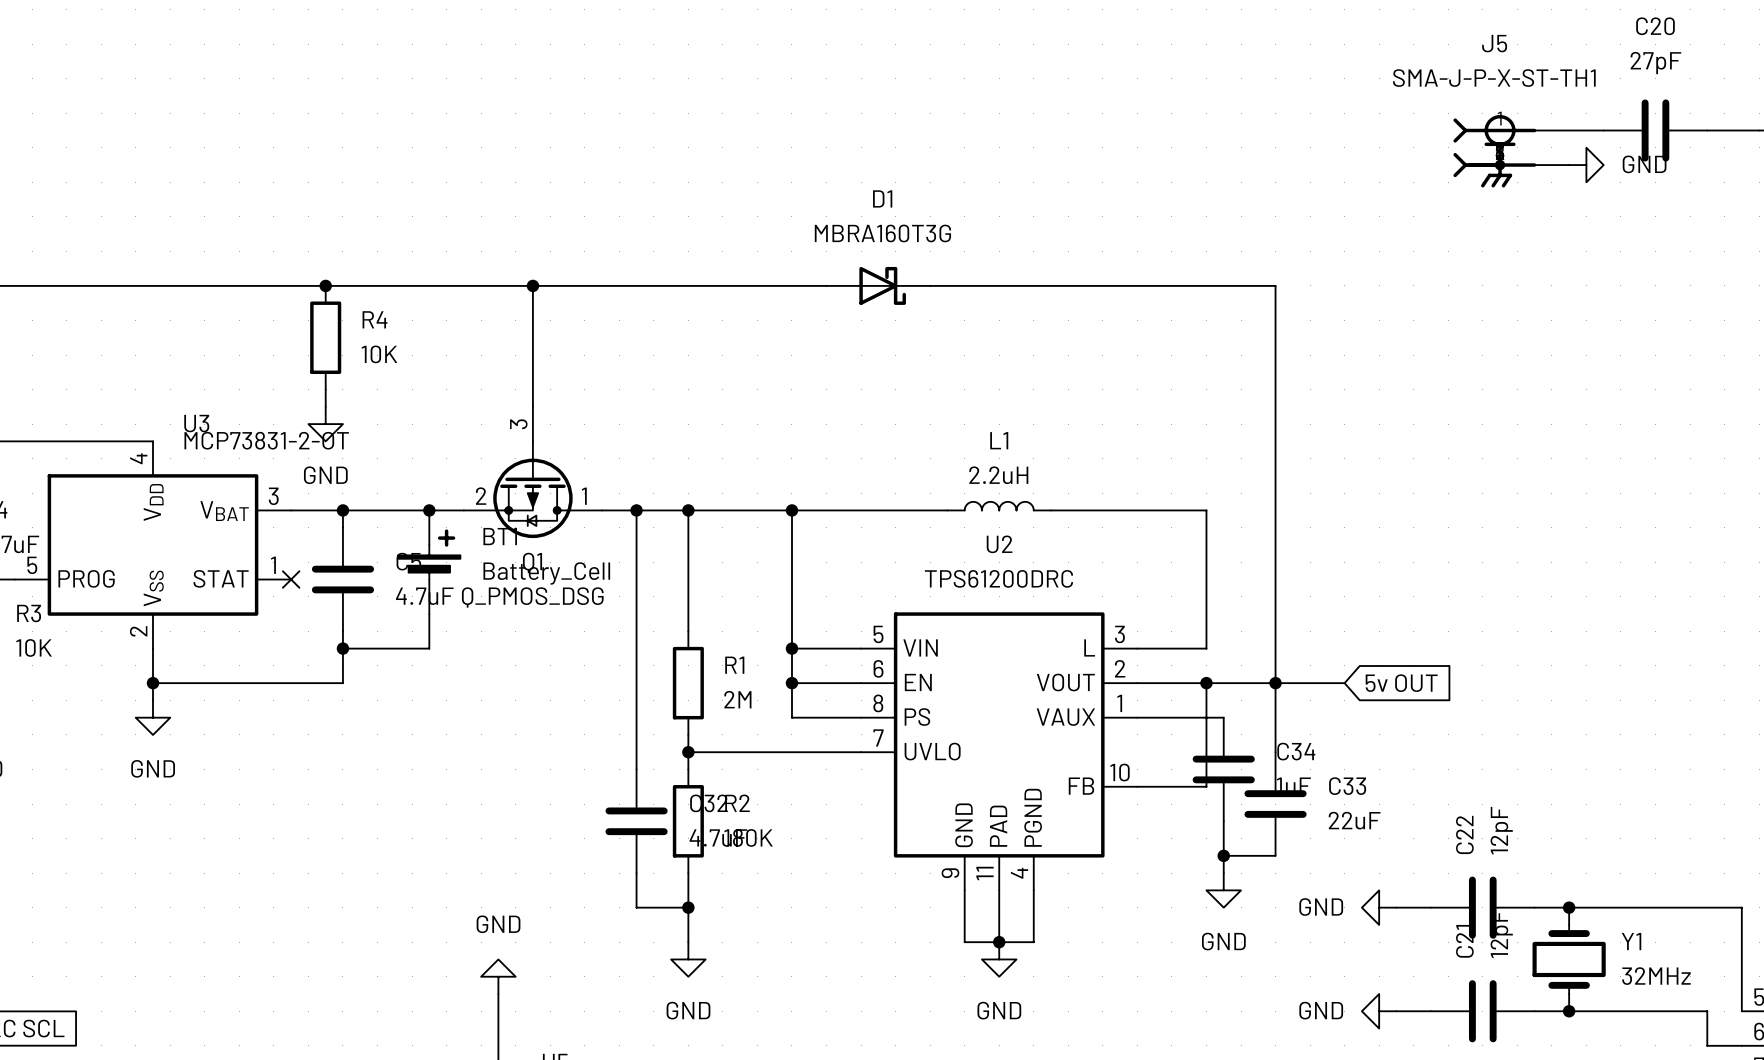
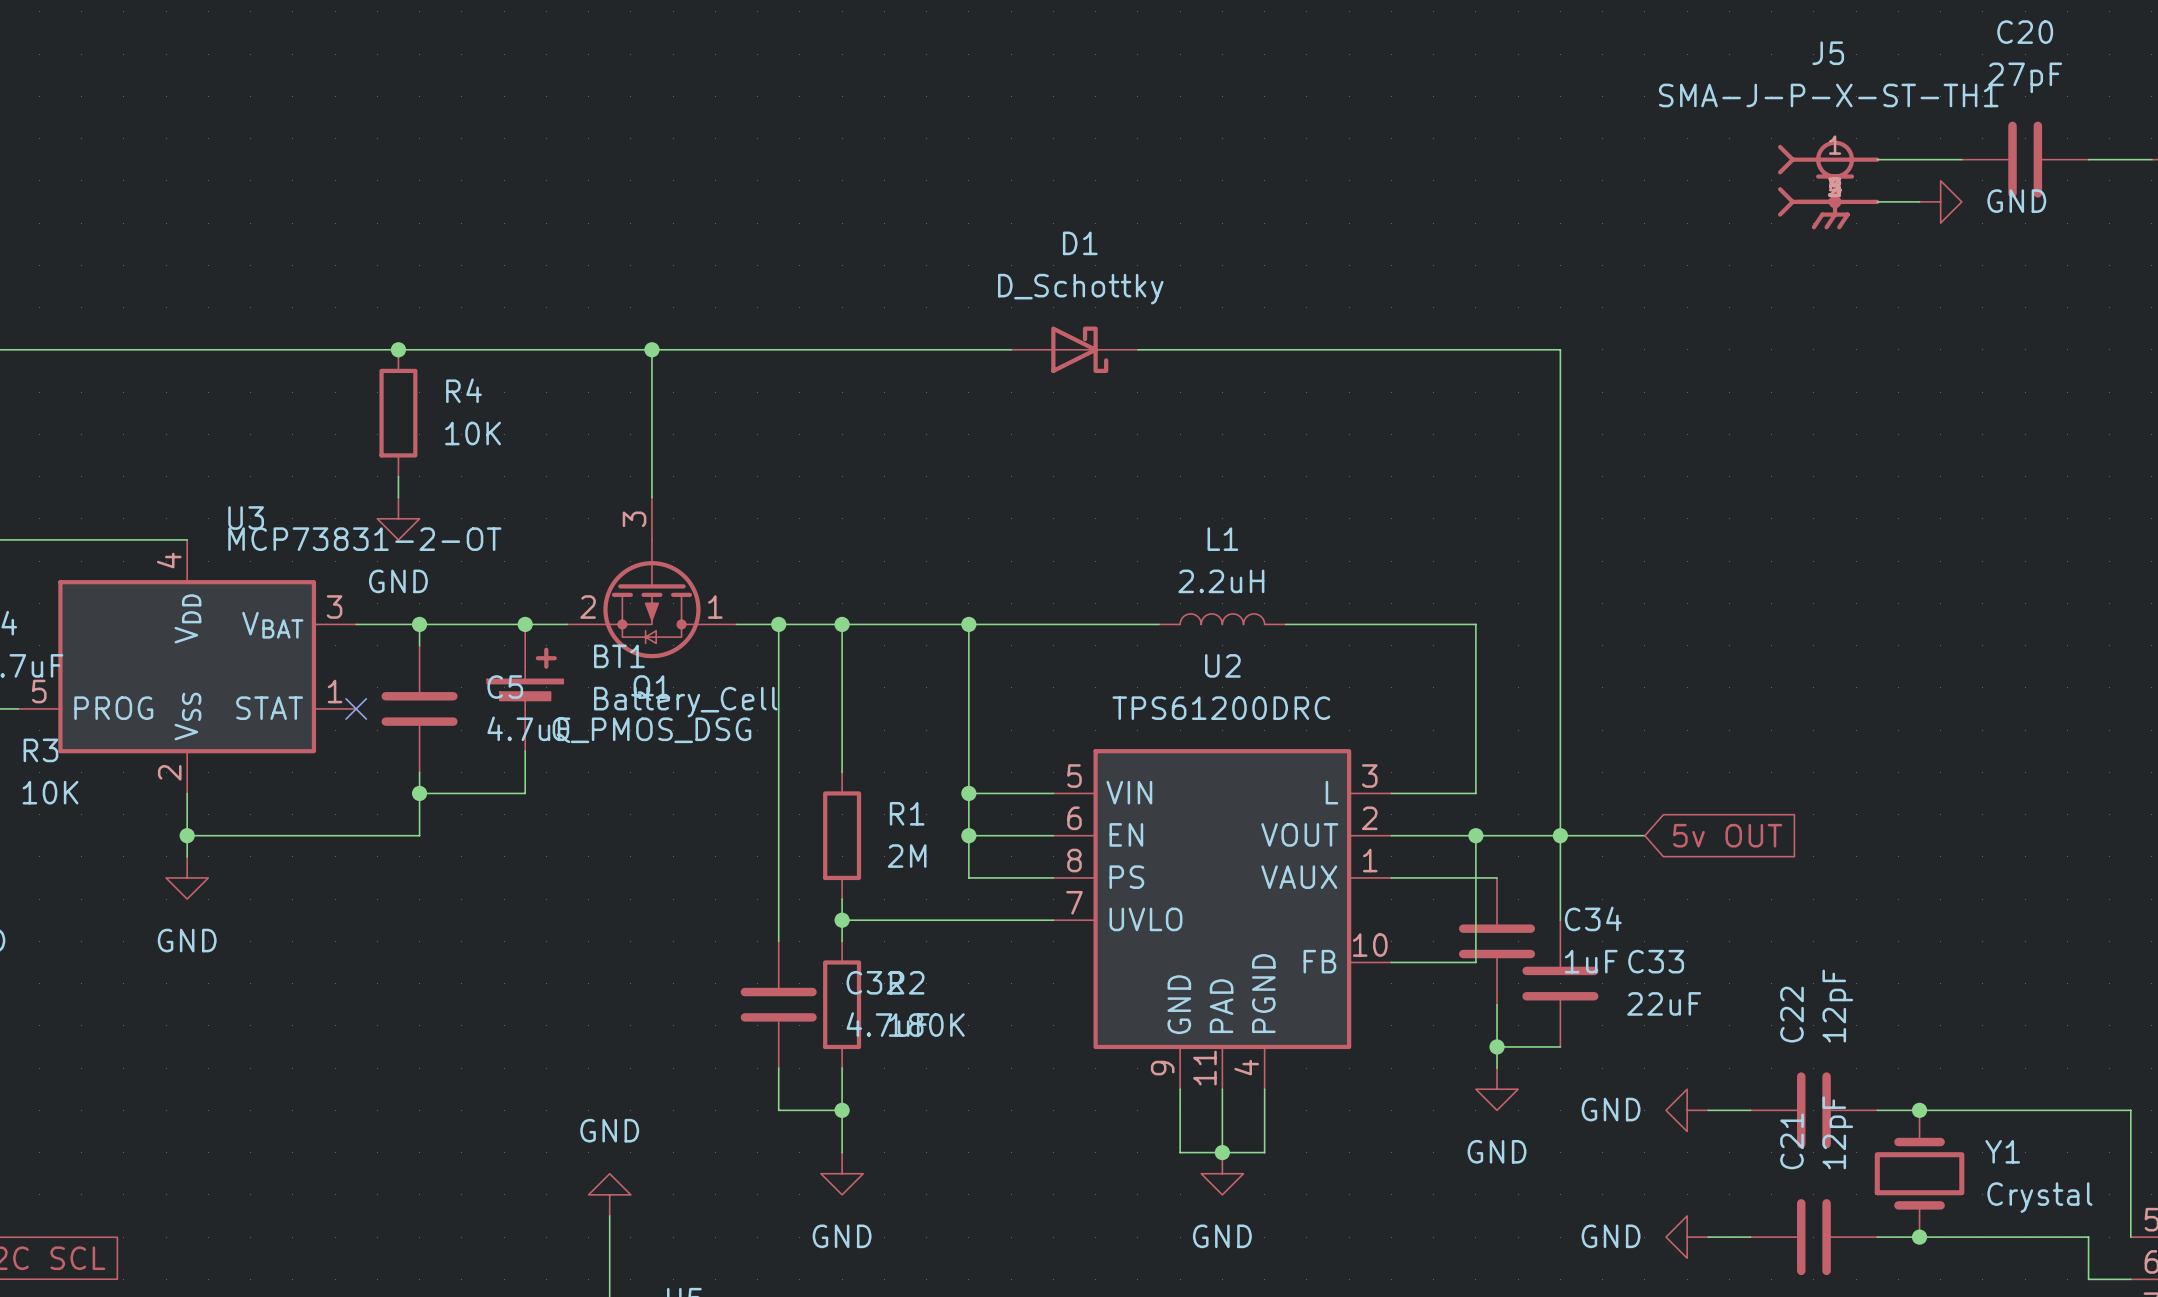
D1 value: MBRA160T3G (882, 233) -> D_Schottky (1080, 289)
Y1 value: 32MHz (1656, 976) -> Crystal (2039, 1197)

